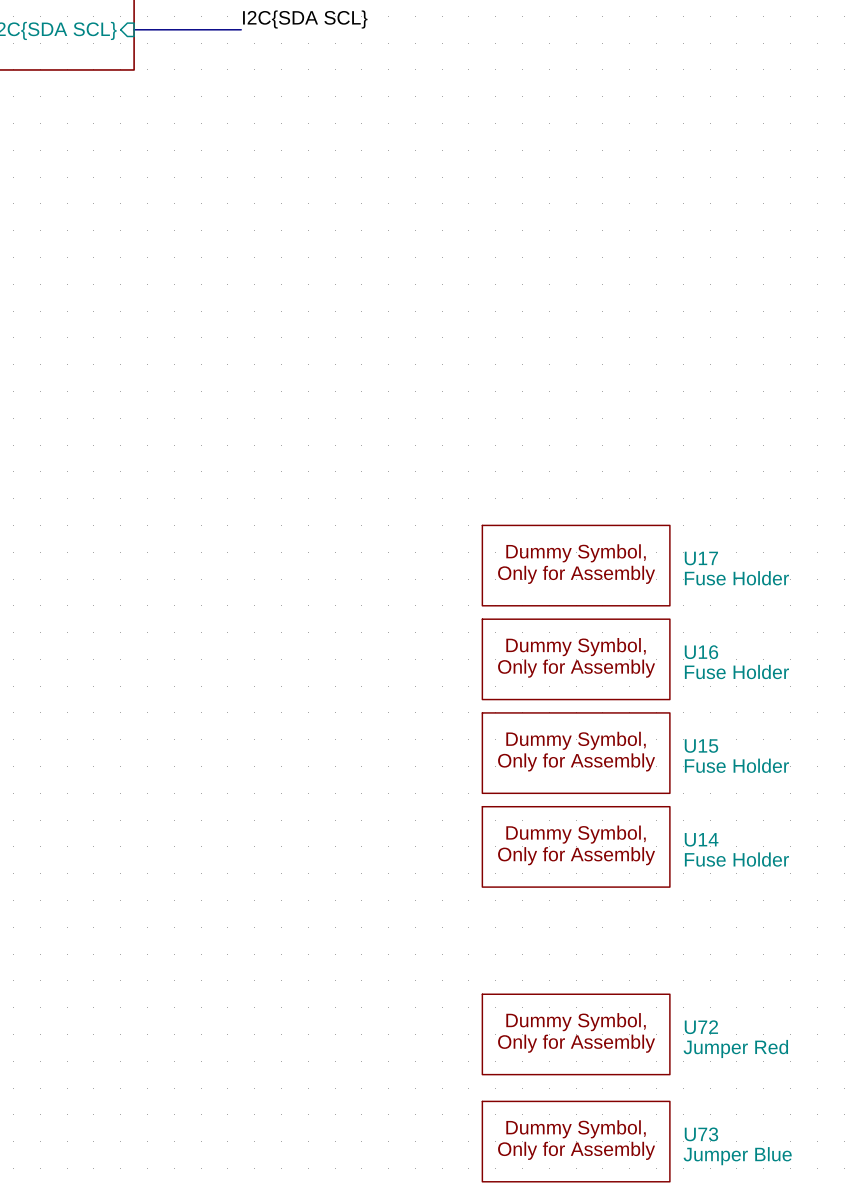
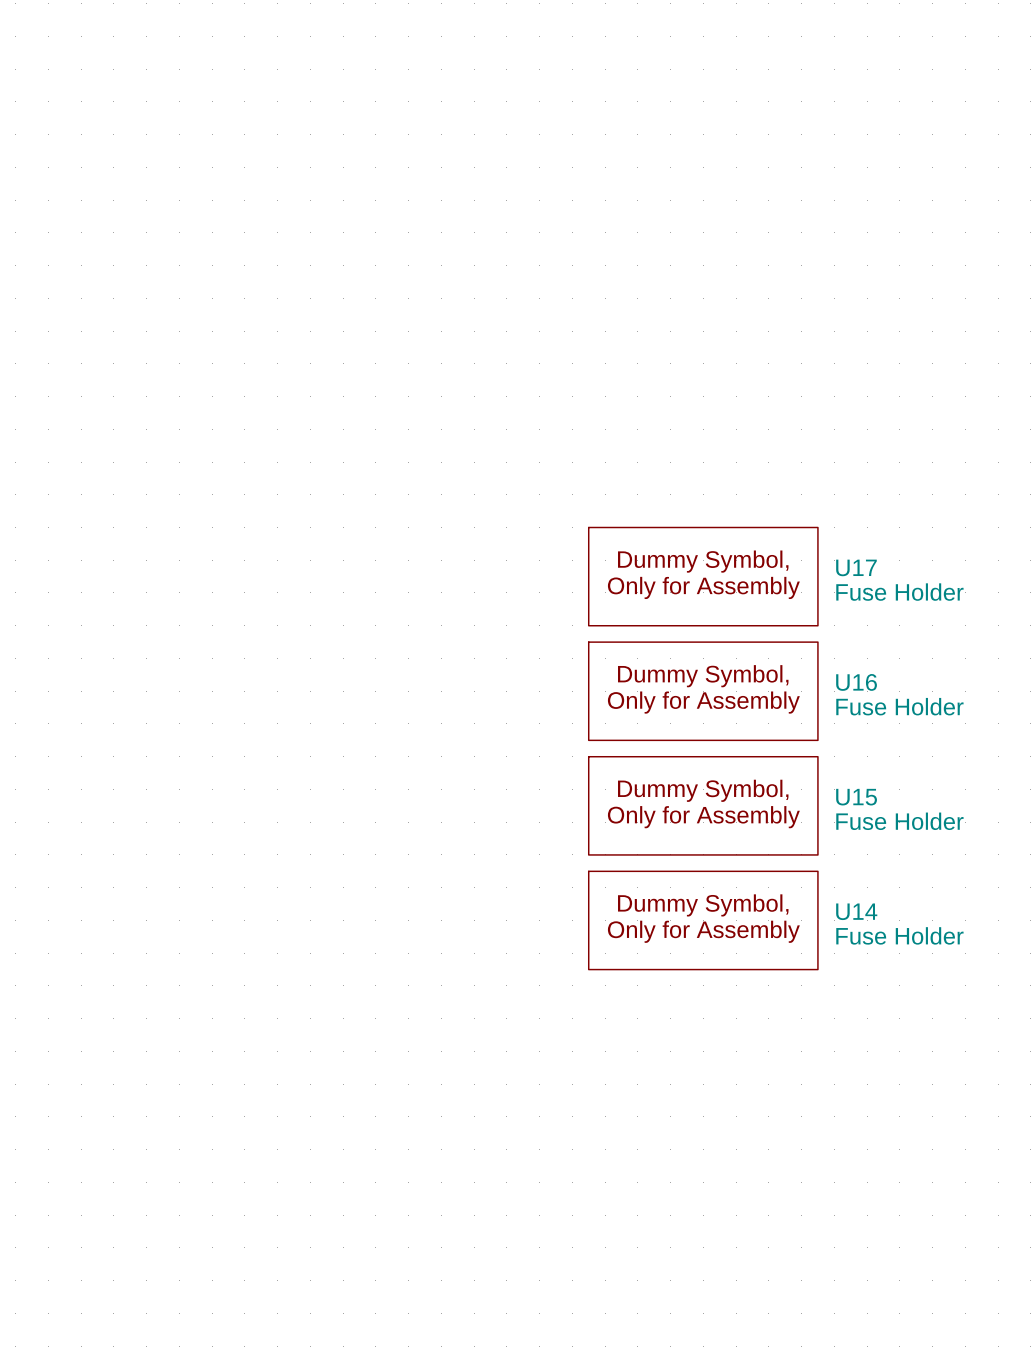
U72: Jumper Red (576, 1034) -> none
U73: Jumper Blue (576, 1141) -> none

